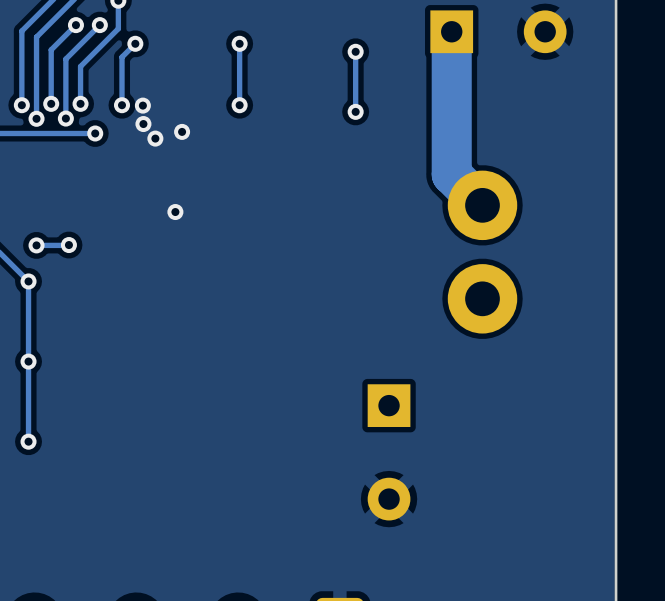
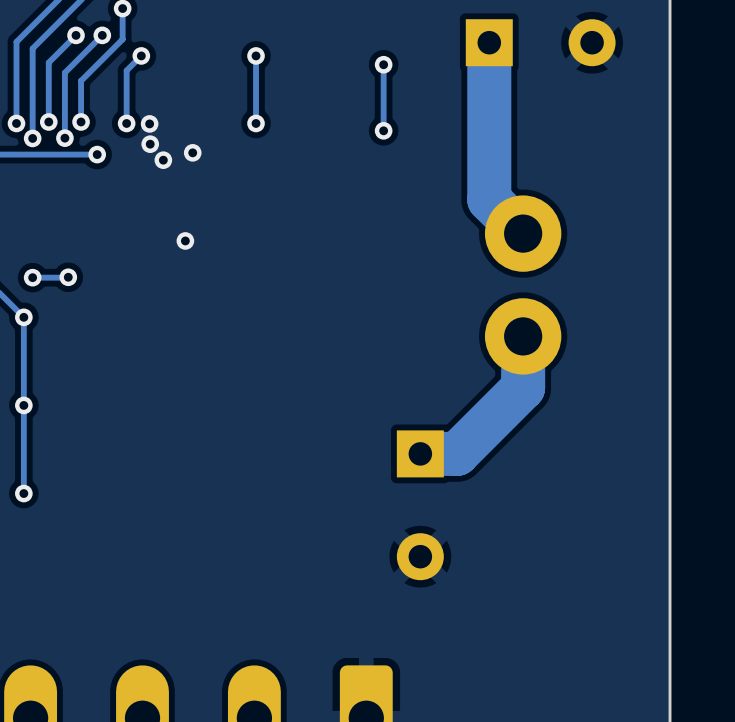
track: none -> (523, 336) (523, 387) (457, 453) (420, 453)

